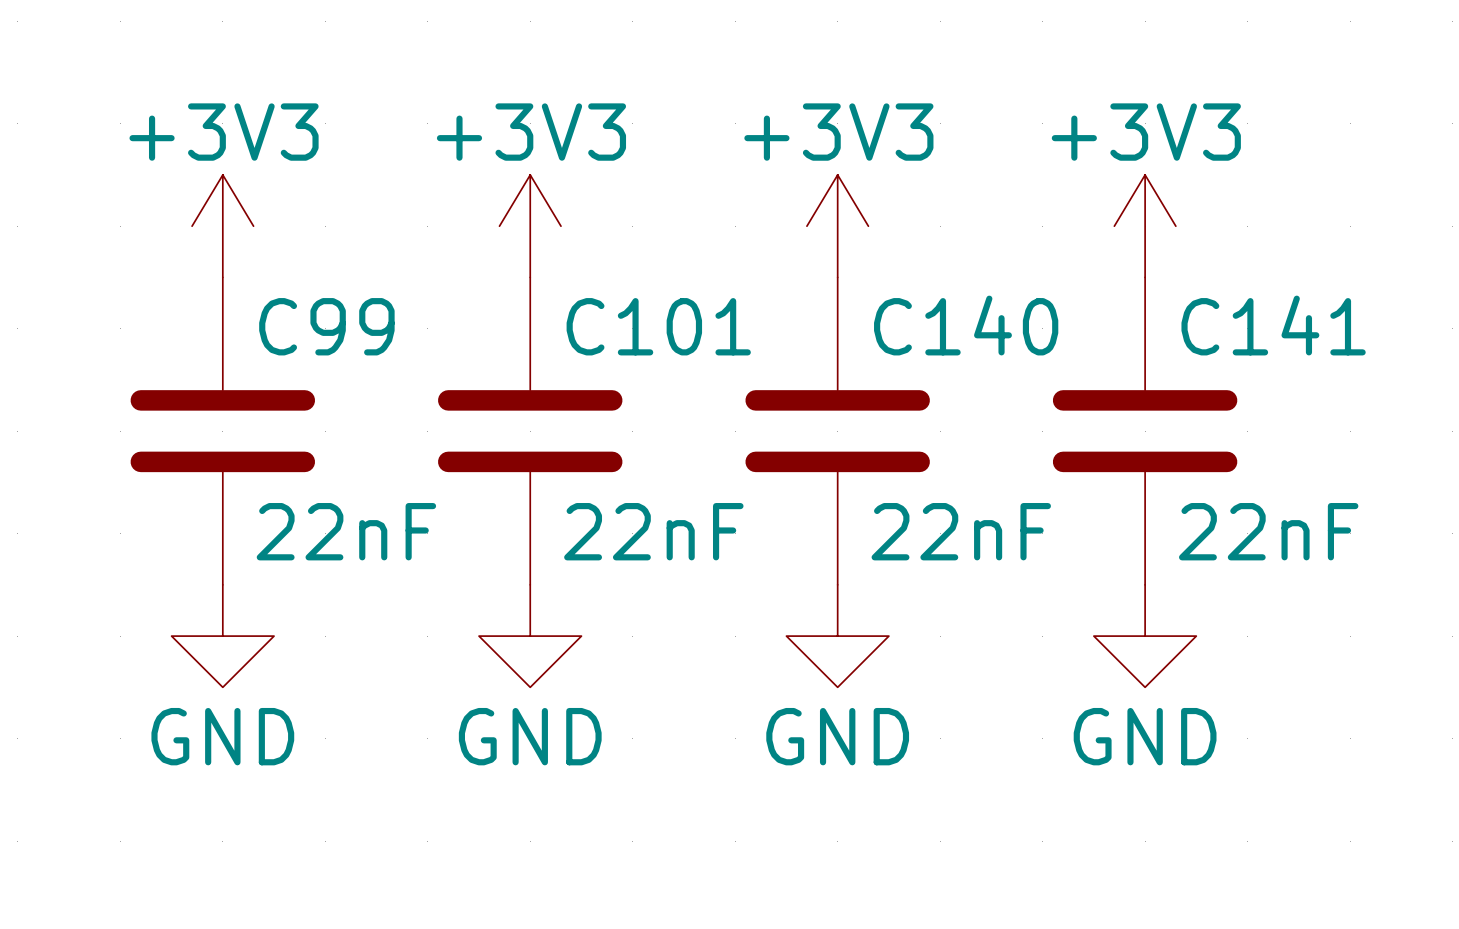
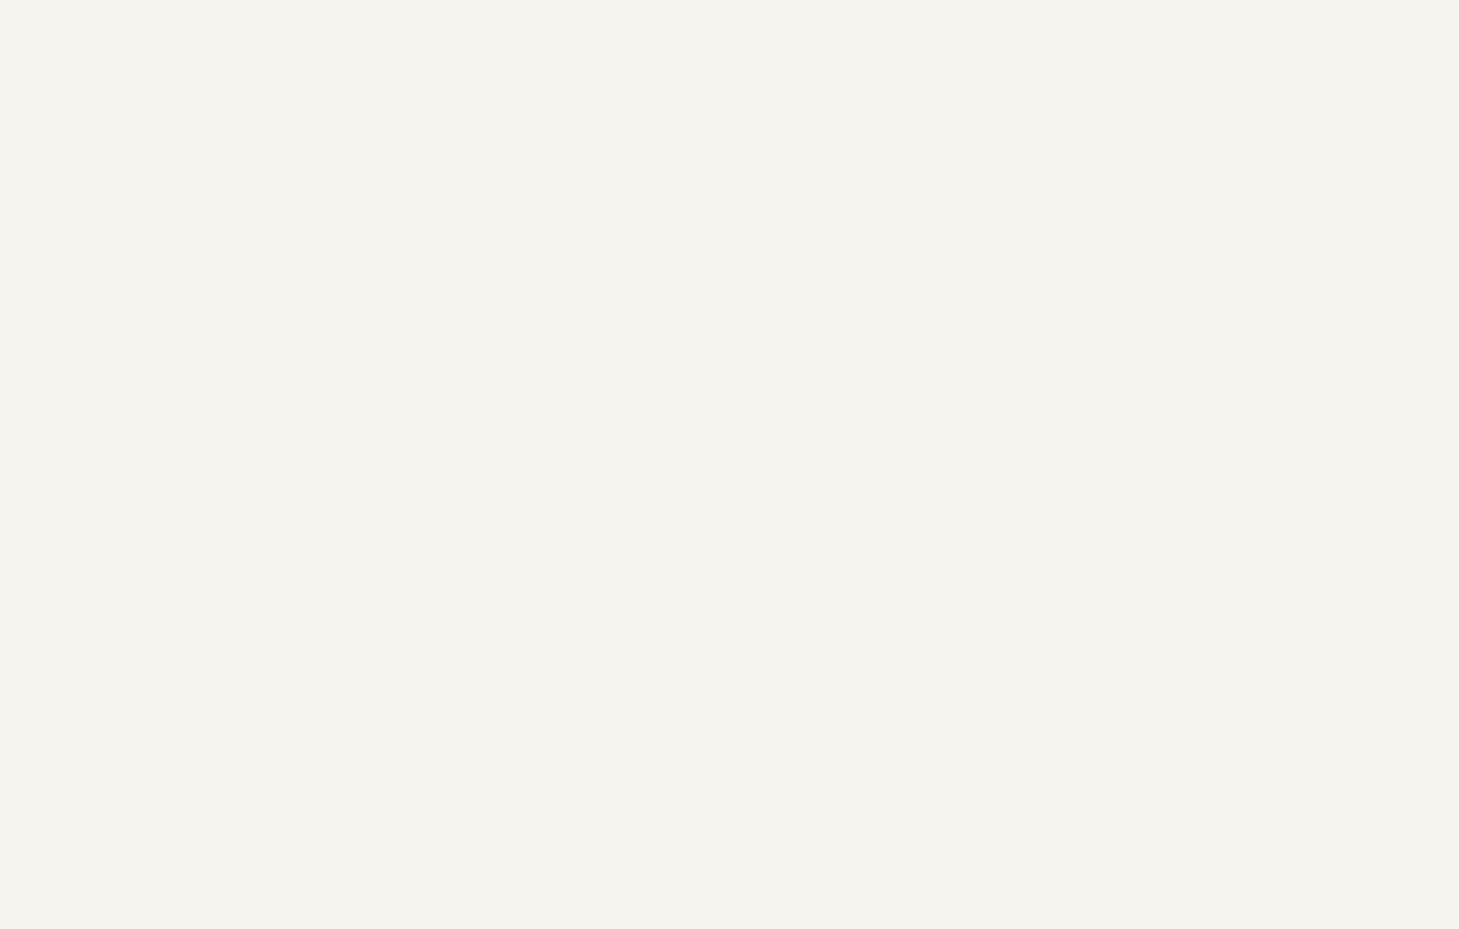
power symbol: +3V3 (222, 226) -> none
power symbol: +3V3 (530, 226) -> none
power symbol: +3V3 (837, 226) -> none
power symbol: +3V3 (1145, 226) -> none
C99: 22nF (222, 431) -> none
C101: 22nF (530, 431) -> none
C140: 22nF (837, 431) -> none
C141: 22nF (1145, 431) -> none
power symbol: GND (222, 636) -> none
power symbol: GND (530, 636) -> none
power symbol: GND (837, 636) -> none
power symbol: GND (1145, 636) -> none

